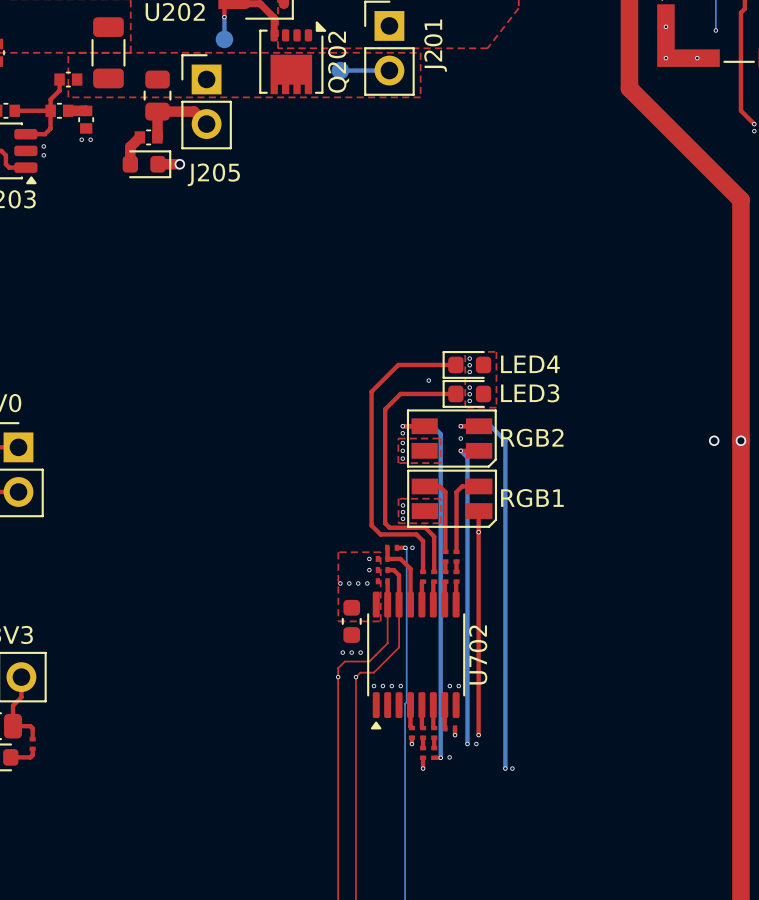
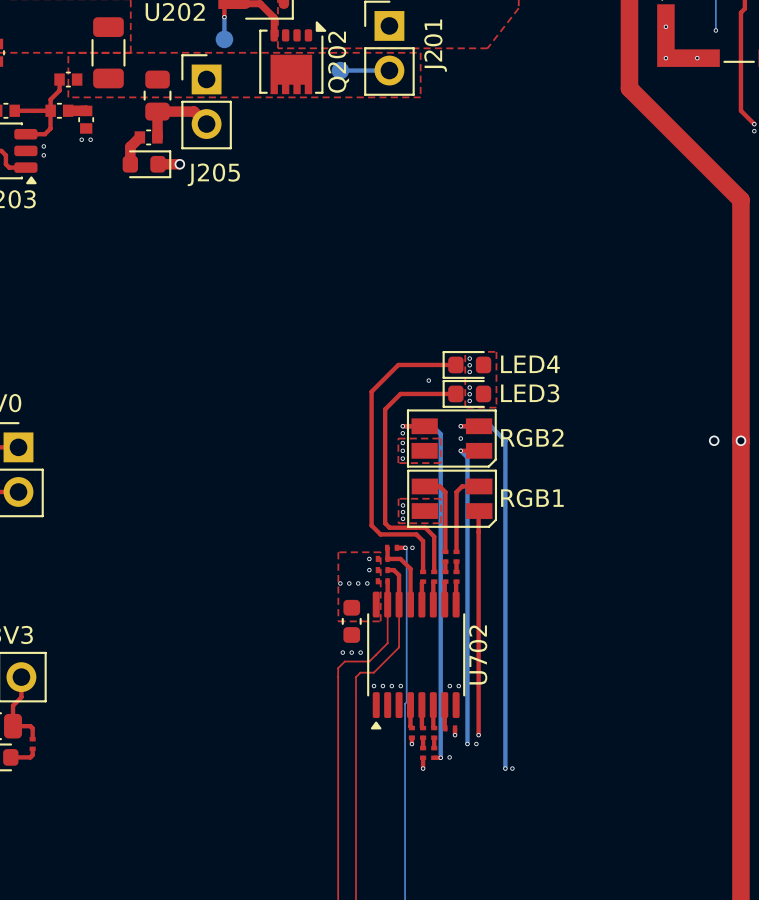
via: (478, 532) -> none
via: (338, 677) -> none
via: (355, 677) -> none

